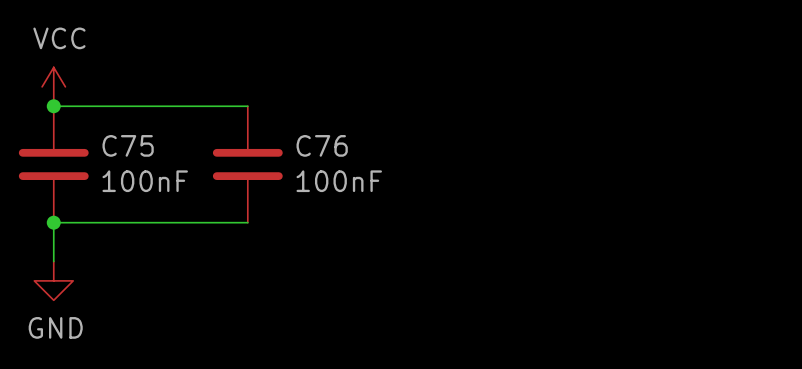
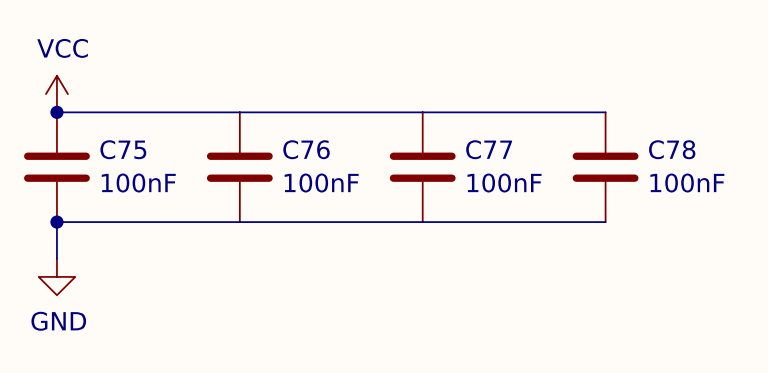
wire: none -> (239, 112) (605, 112)
C77: none -> 100nF (422, 167)
C78: none -> 100nF (605, 167)
wire: none -> (239, 222) (605, 222)

